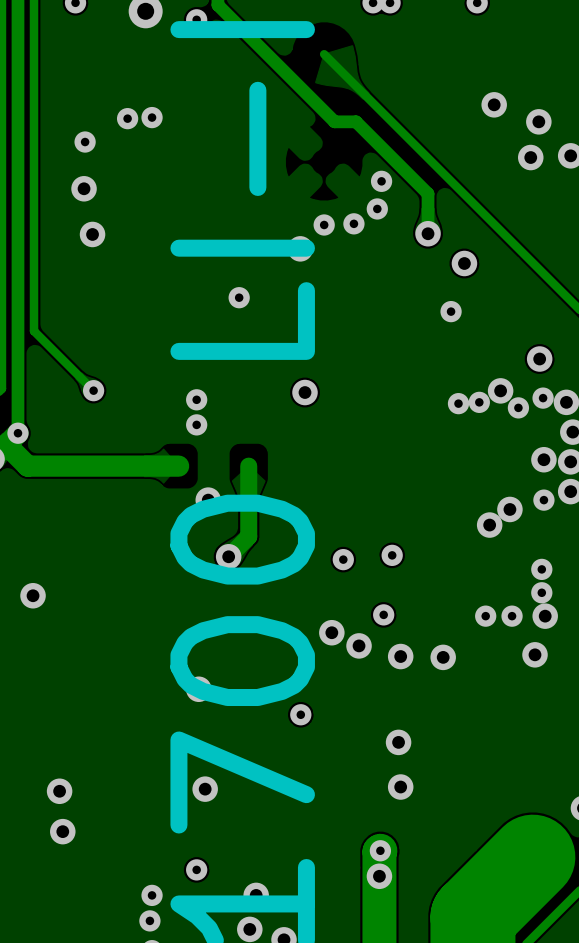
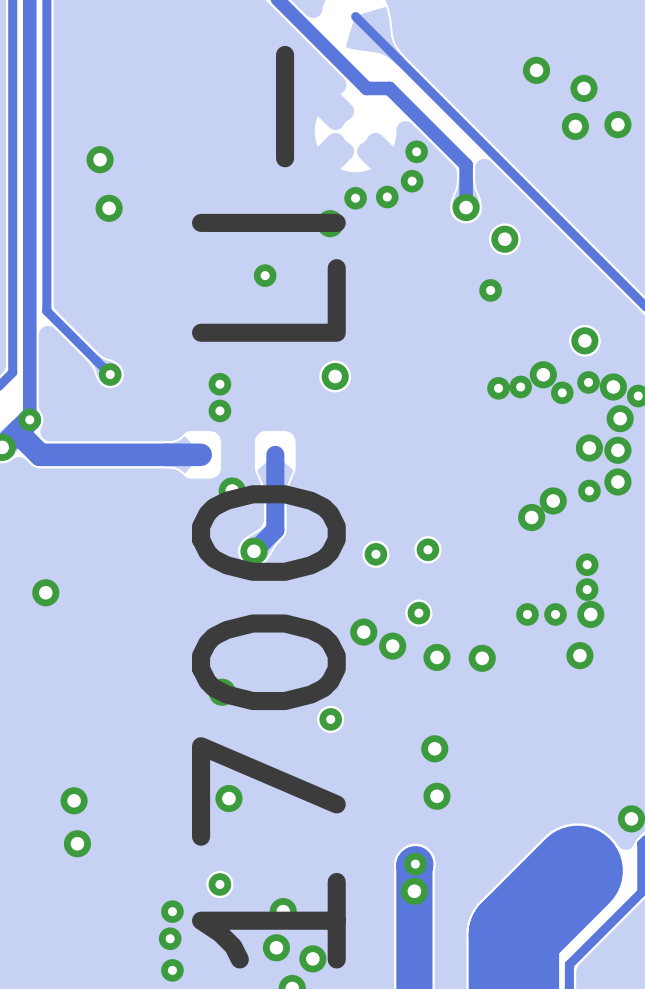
via: (152, 117) -> none
via: (127, 118) -> none
via: (85, 142) -> none

